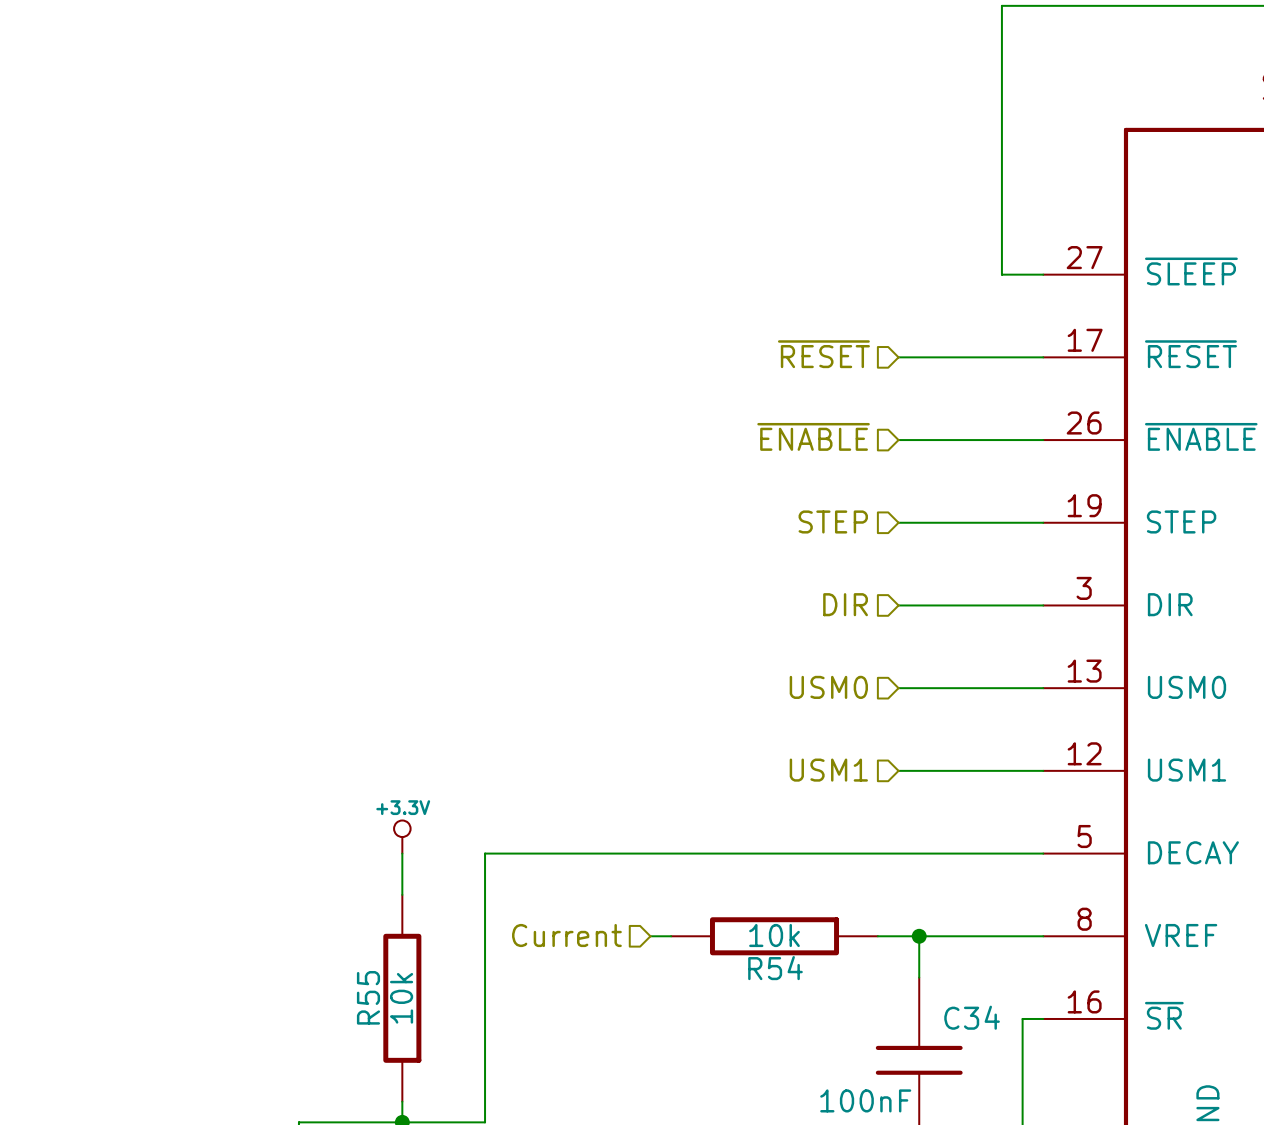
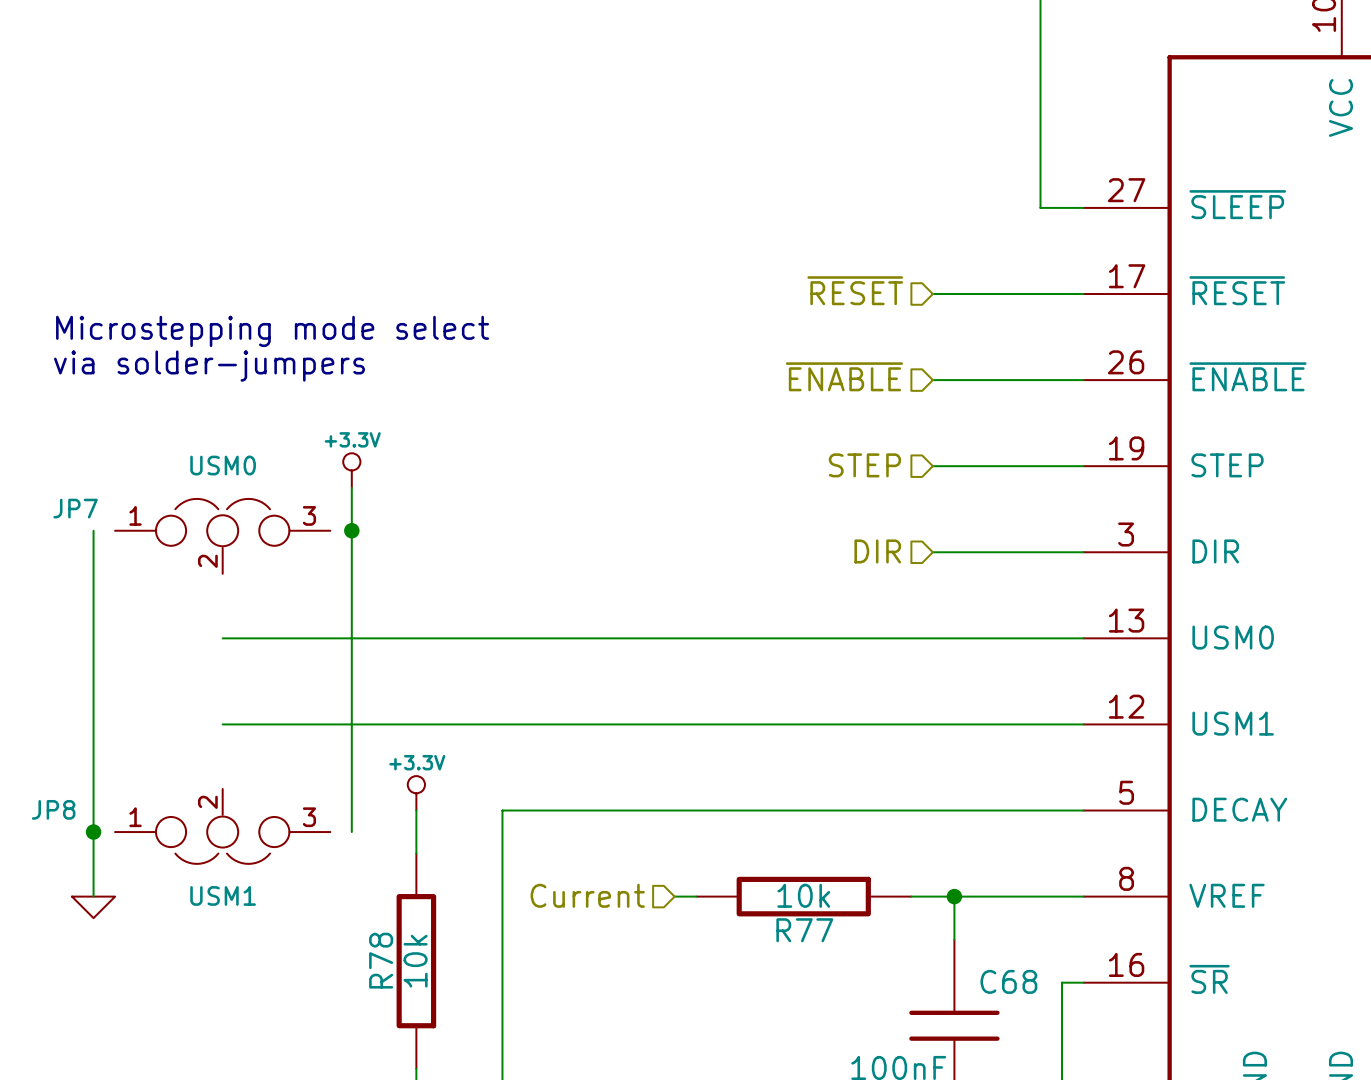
text: none -> Microstepping mode select (272, 331)
text: none -> via solder-jumpers (209, 366)
power symbol: none -> +3.3V (351, 470)
wire: none -> (351, 487) (351, 832)
wire: none -> (93, 530) (93, 896)
junction: none -> (351, 530)
JP7: none -> USM0 (222, 536)
hierarchical label: USM0 (828, 687) -> none
wire: none -> (222, 638) (932, 638)
wire: none -> (222, 724) (932, 724)
hierarchical label: USM1 (828, 770) -> none
JP8: none -> USM1 (222, 826)
junction: none -> (93, 832)
power symbol: none -> (93, 907)
R54 name: R54 (775, 968) -> R77 (804, 930)
R55 name: R55 (368, 997) -> R78 (381, 960)
C34 name: C34 (972, 1017) -> C68 (1008, 981)

